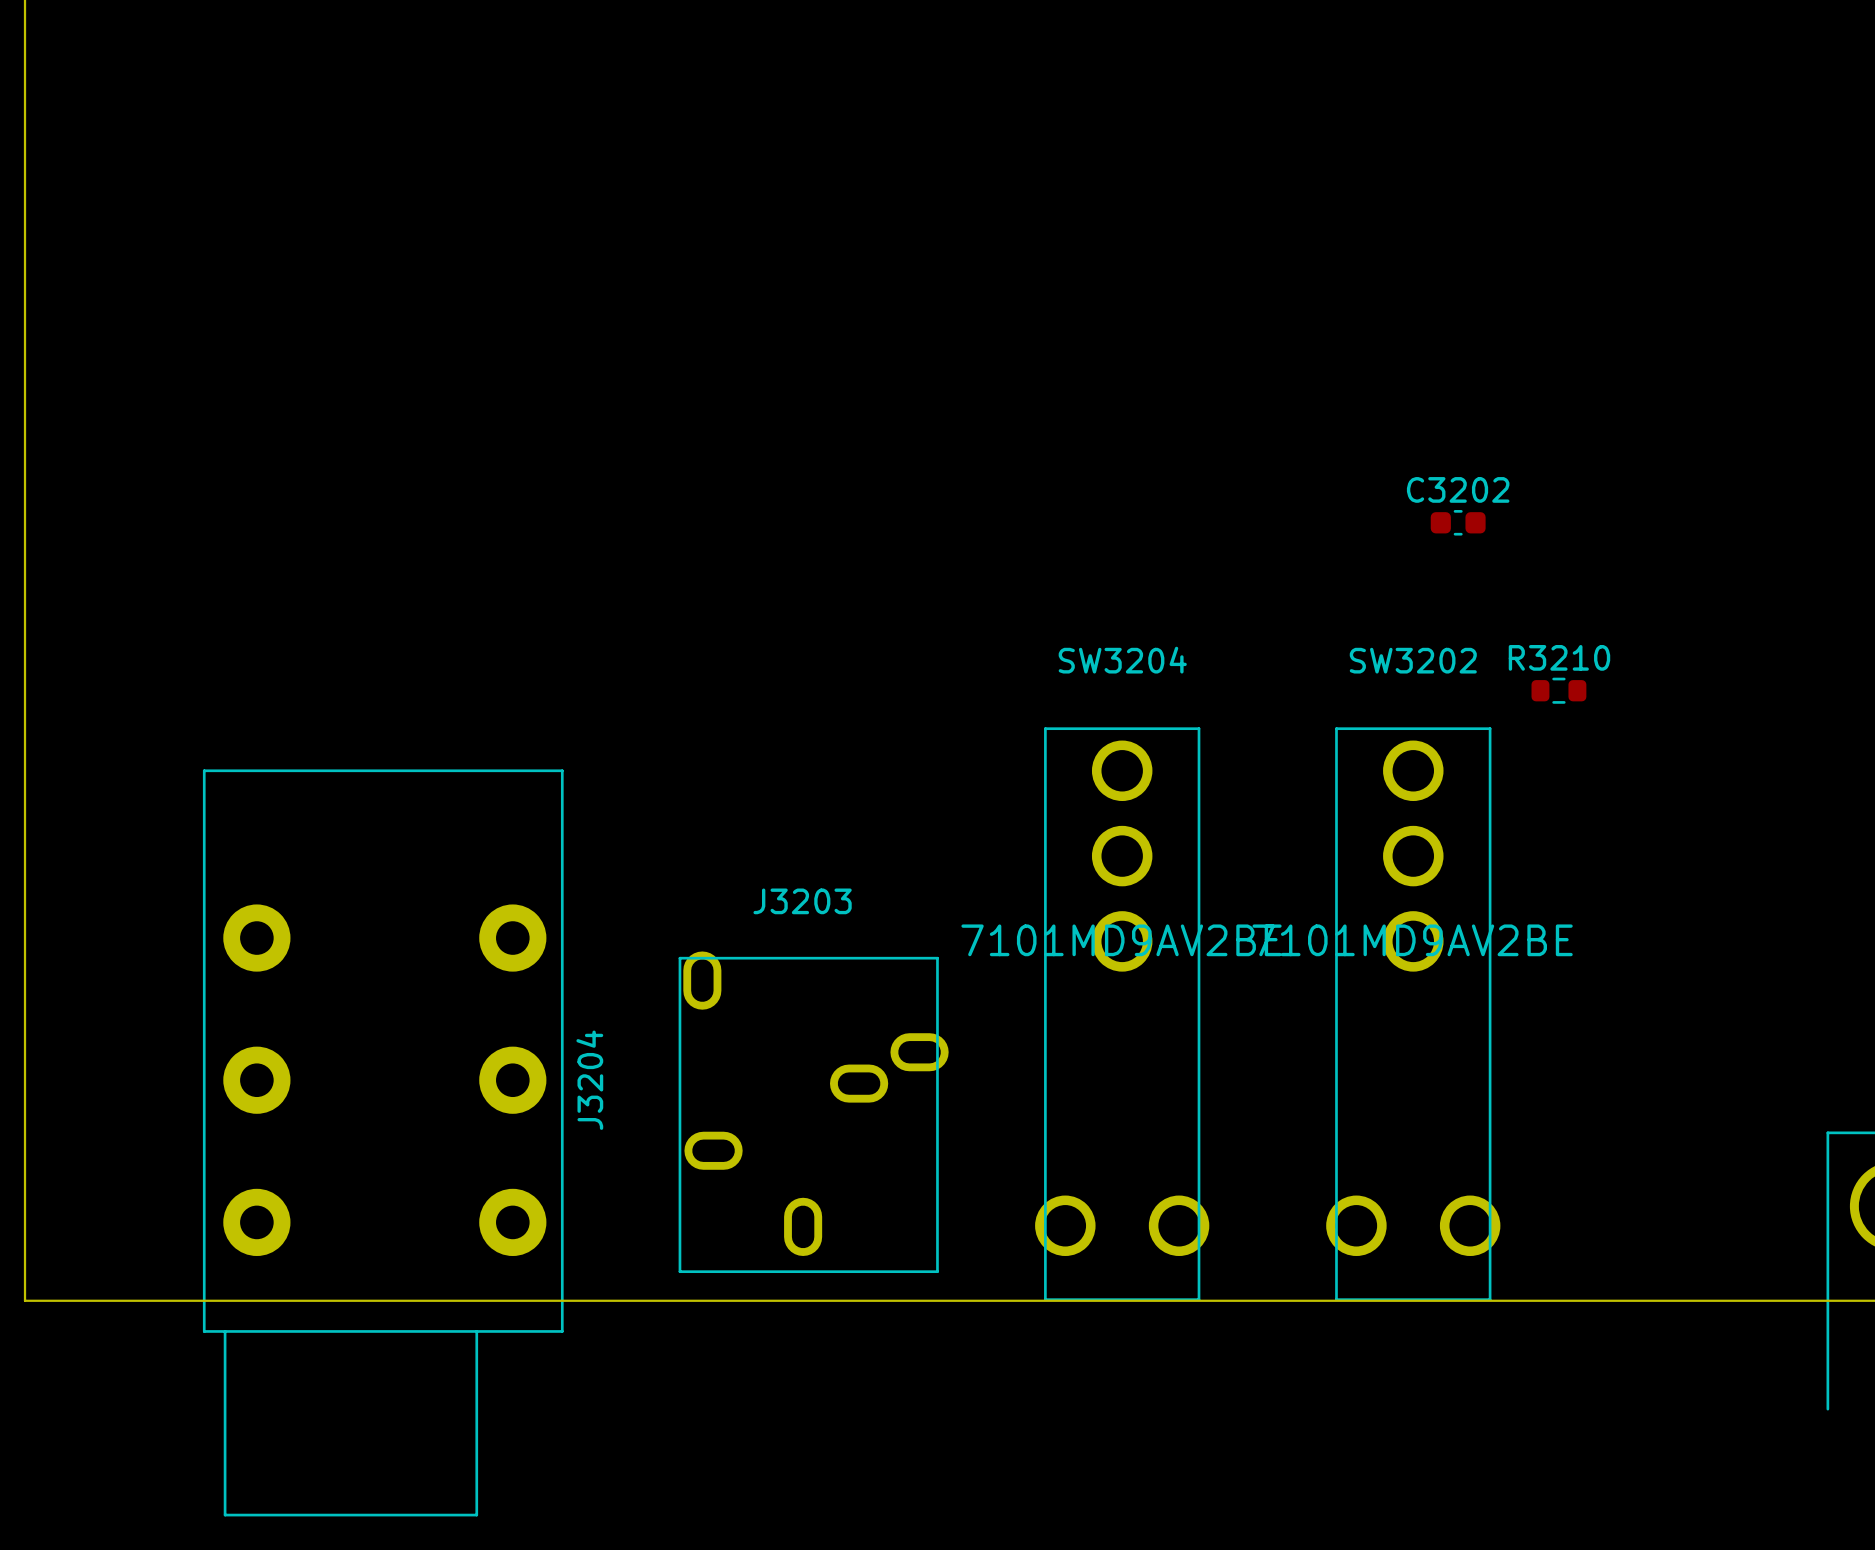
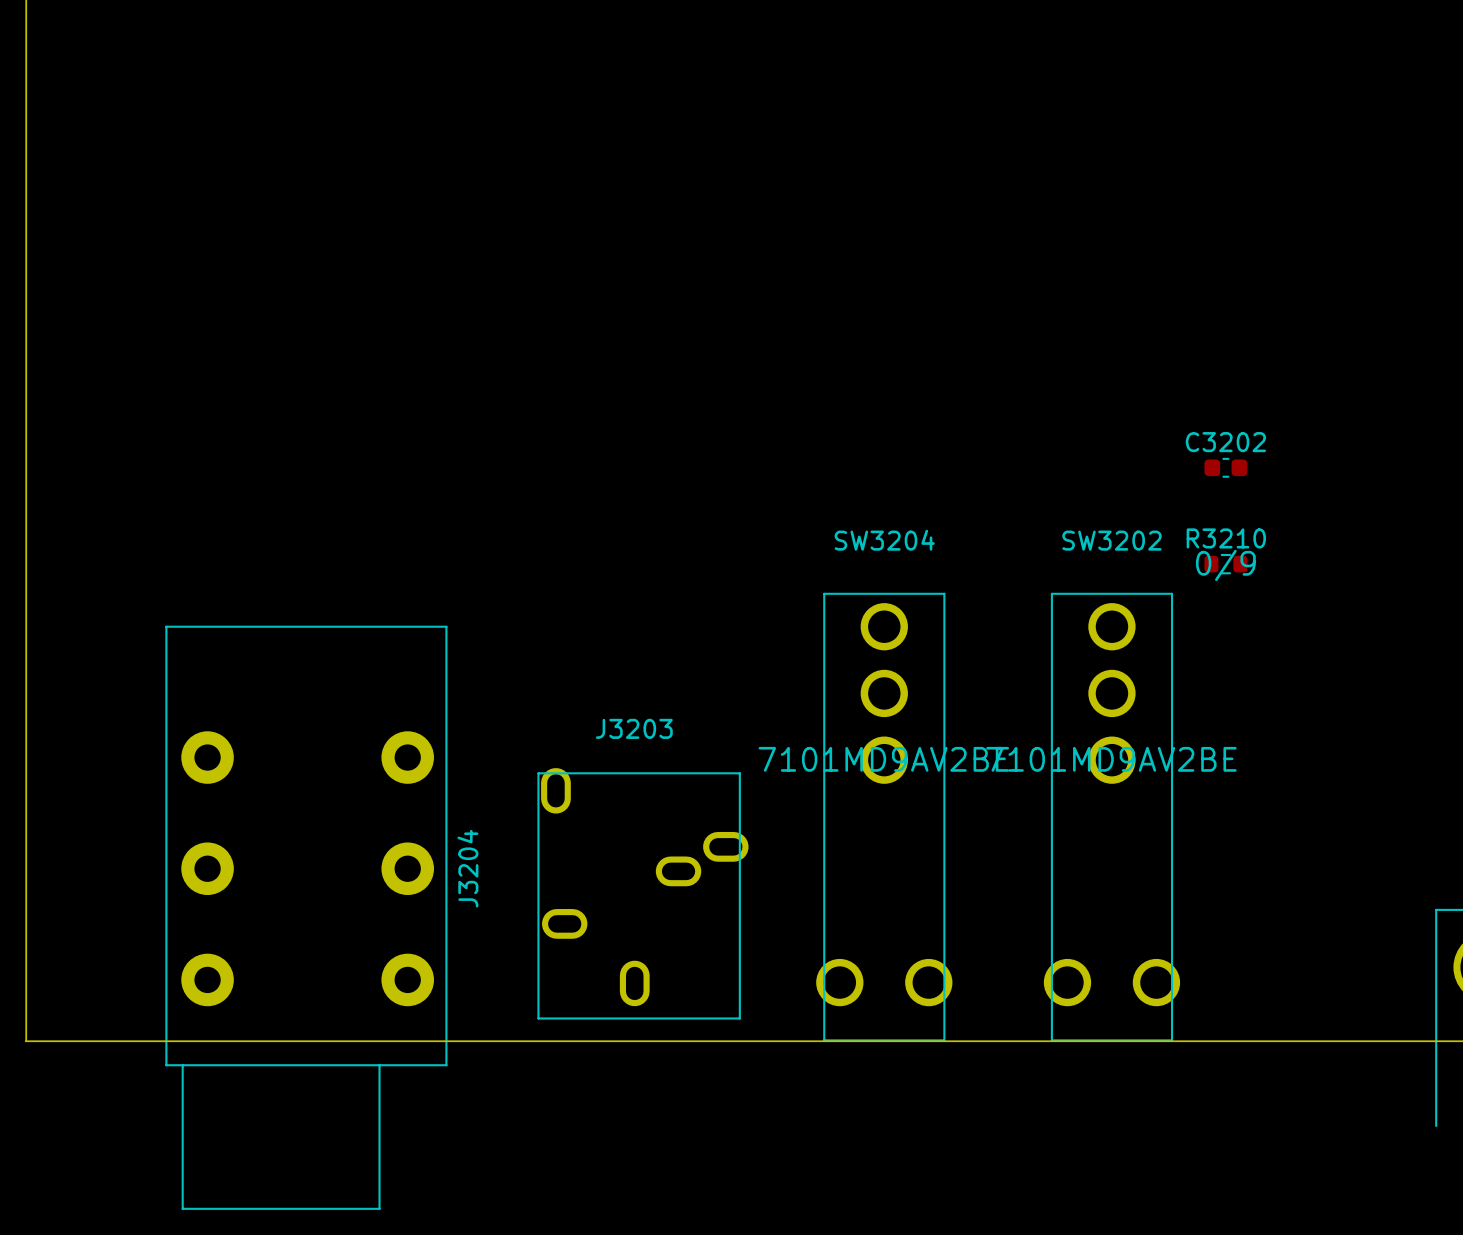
C3202 position: (1458, 522) -> (1225, 467)
R3210 text: none -> 0/9 (1225, 565)

